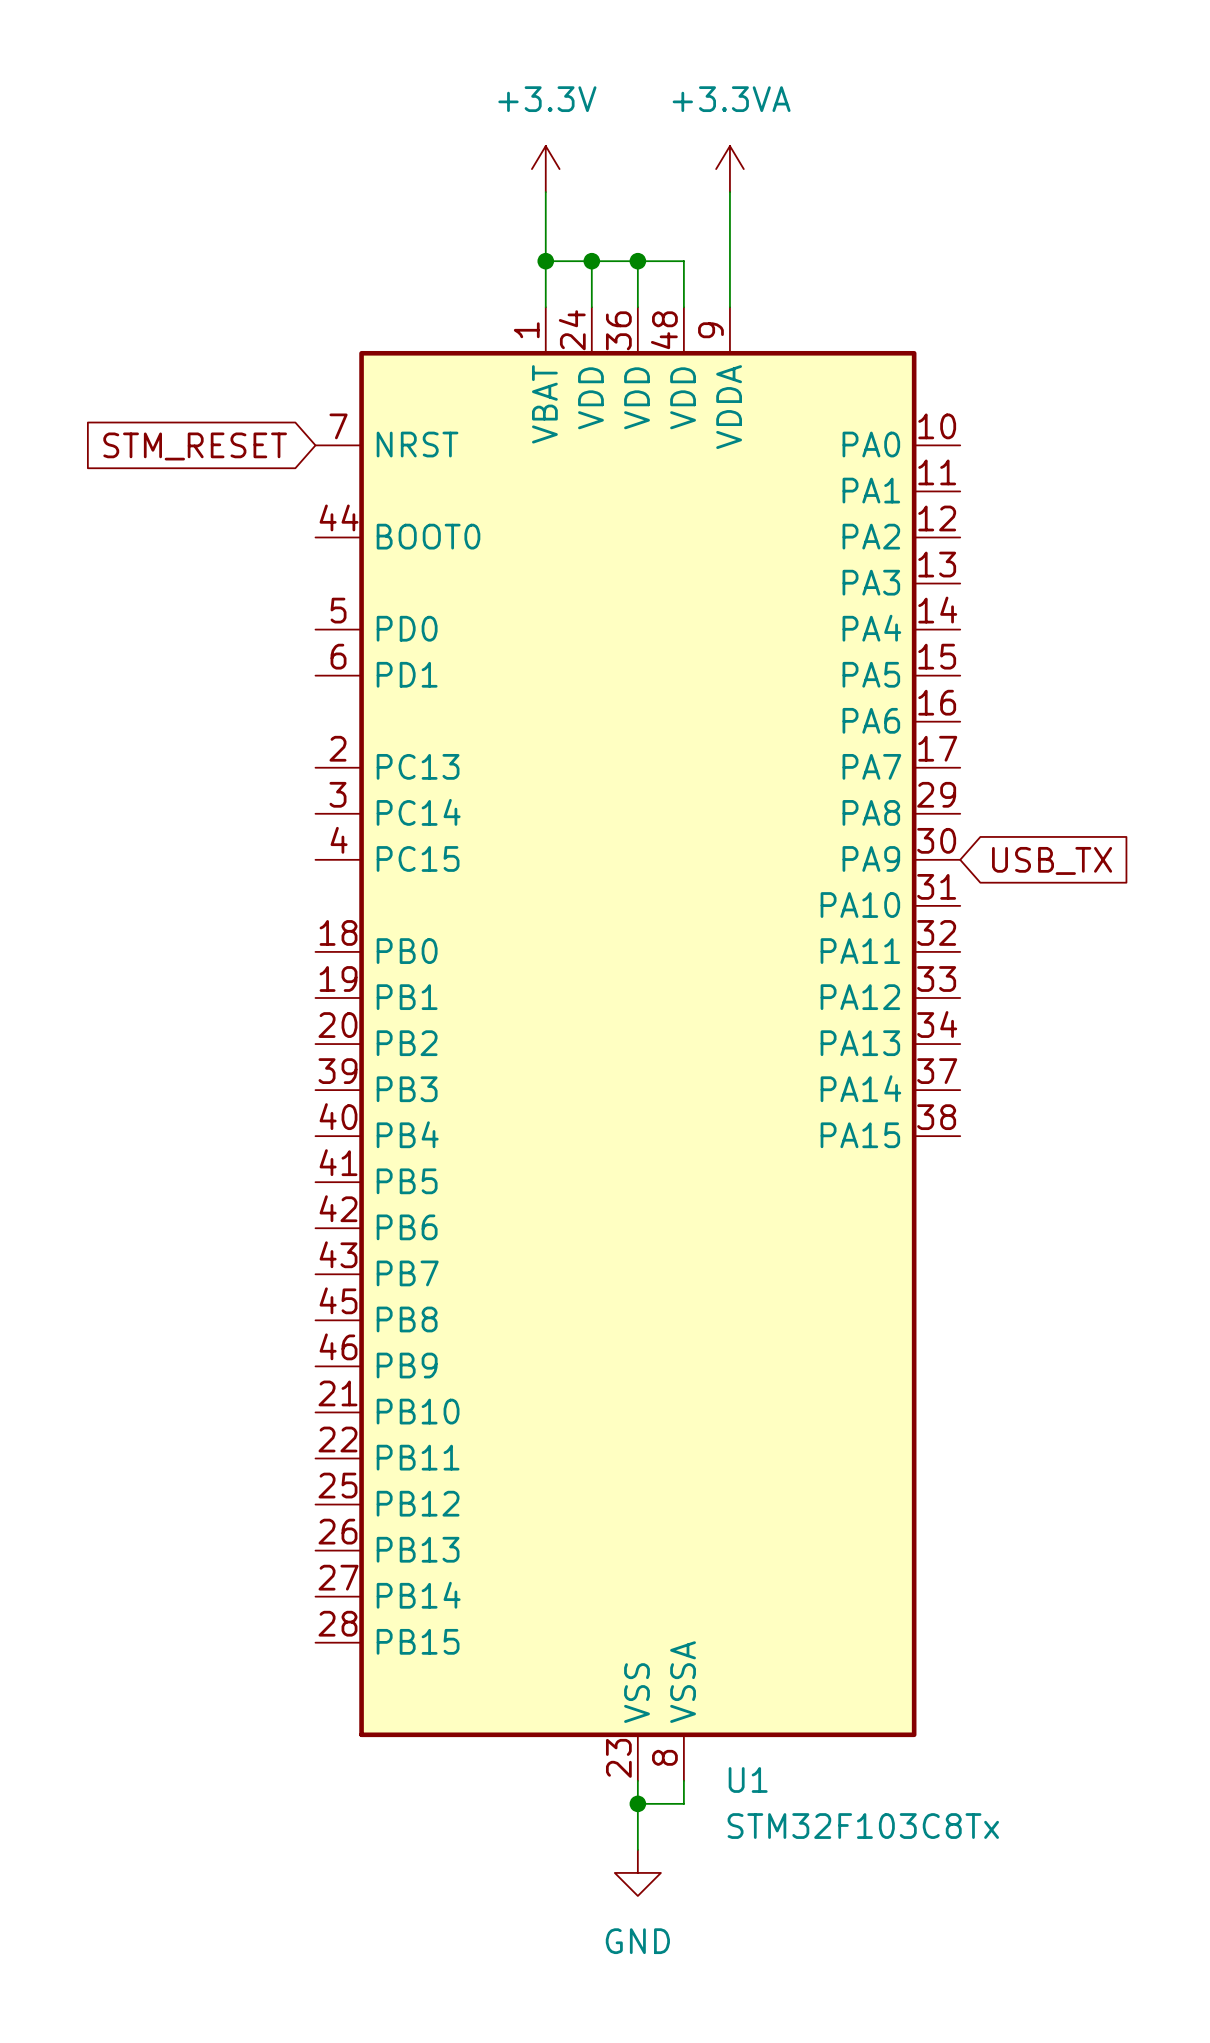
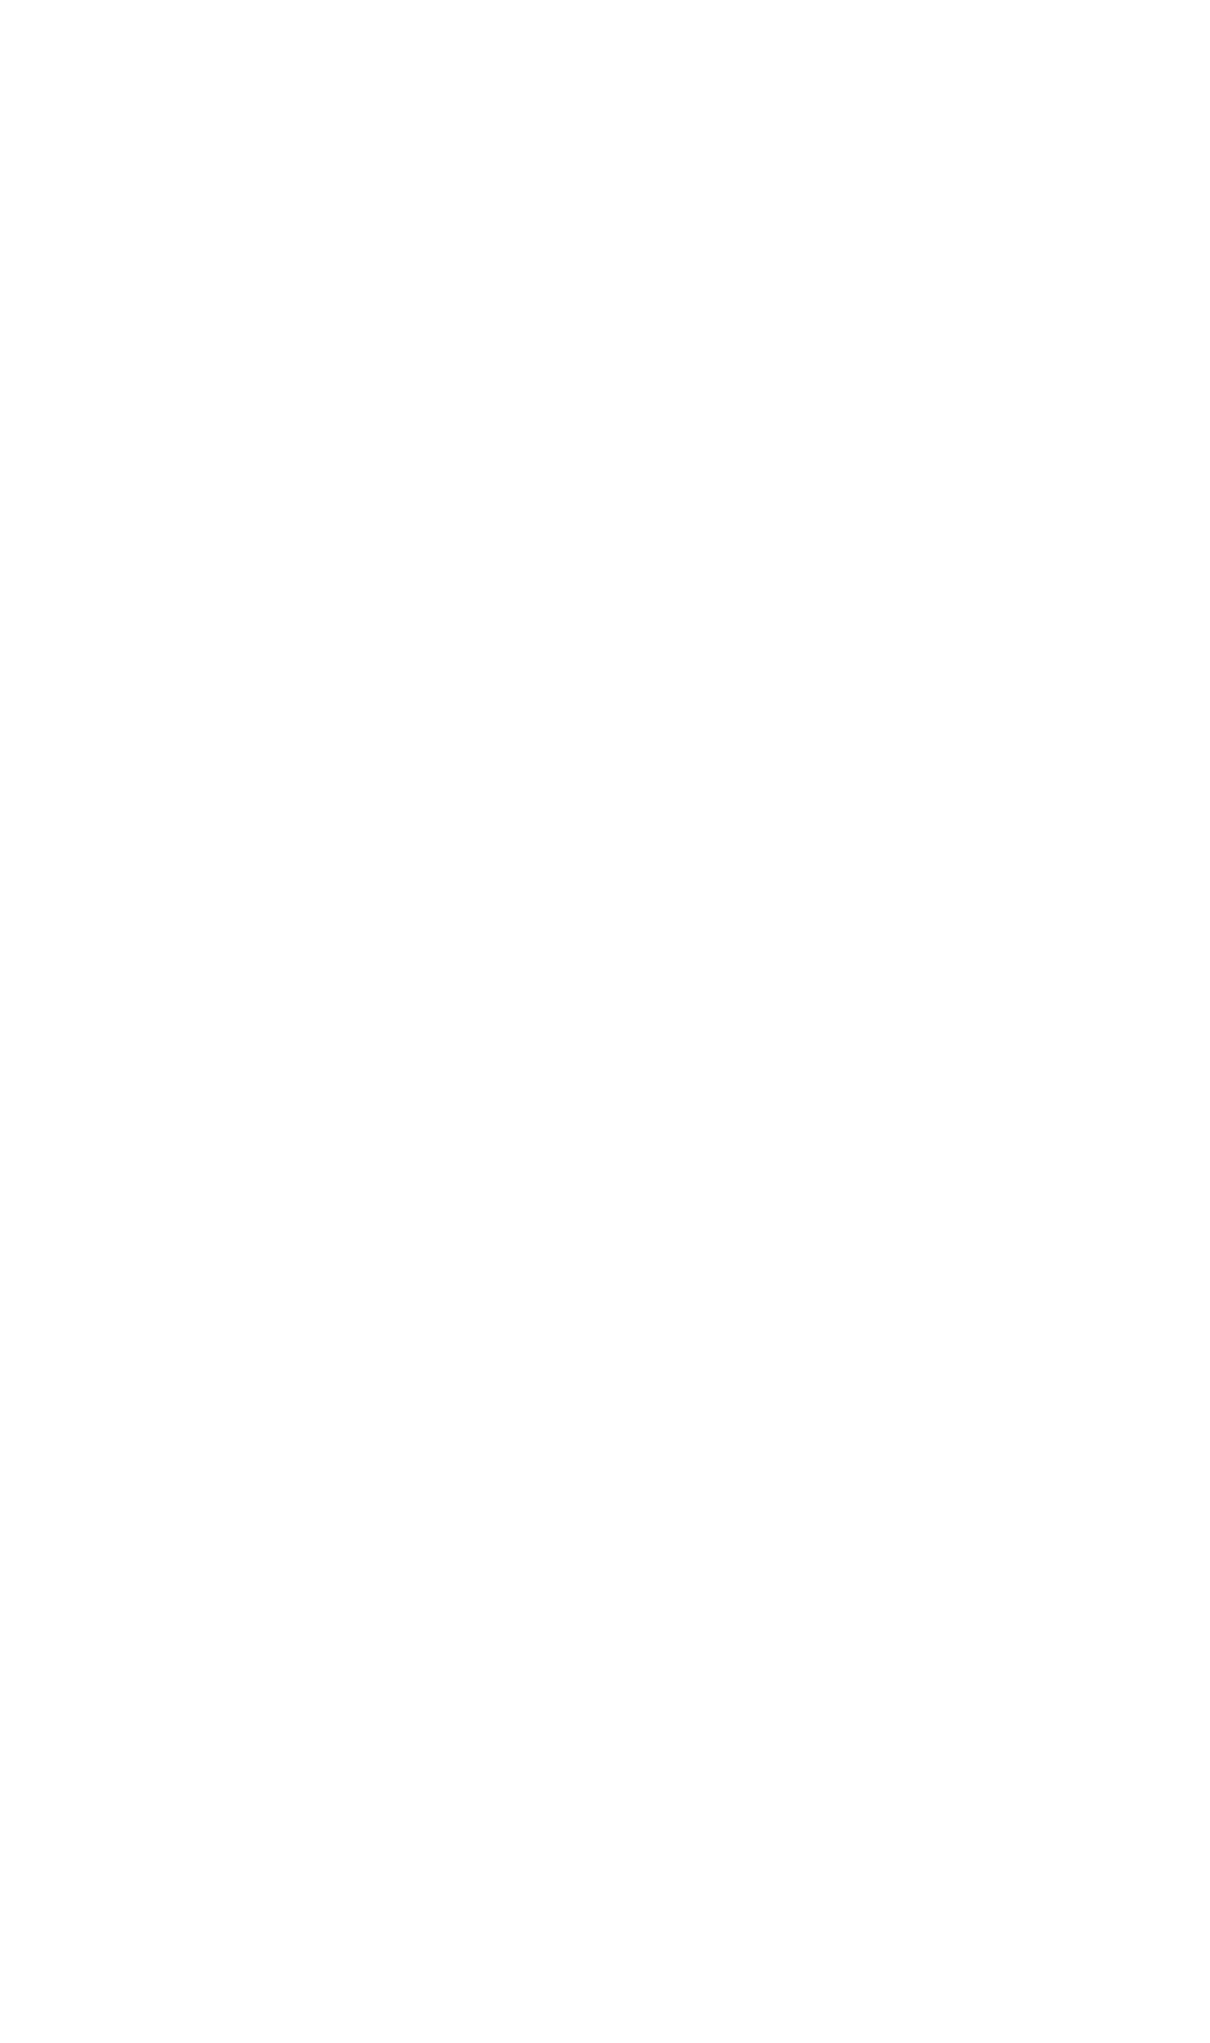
power symbol: +3.3V (545, 169) -> none
power symbol: +3.3VA (729, 169) -> none
wire: (545, 192) (545, 307) -> none
wire: (729, 192) (729, 307) -> none
wire: (545, 261) (683, 261) (683, 307) -> none
junction: (545, 261) -> none
wire: (591, 261) (591, 307) -> none
junction: (591, 261) -> none
wire: (637, 261) (637, 307) -> none
junction: (637, 261) -> none
global label: STM_RESET (195, 446) -> none
global label: USB_TX (1052, 860) -> none
U1: STM32F103C8Tx (637, 1044) -> none
wire: (637, 1780) (637, 1849) -> none
wire: (683, 1780) (683, 1803) (637, 1803) -> none
junction: (637, 1803) -> none
power symbol: GND (637, 1872) -> none

